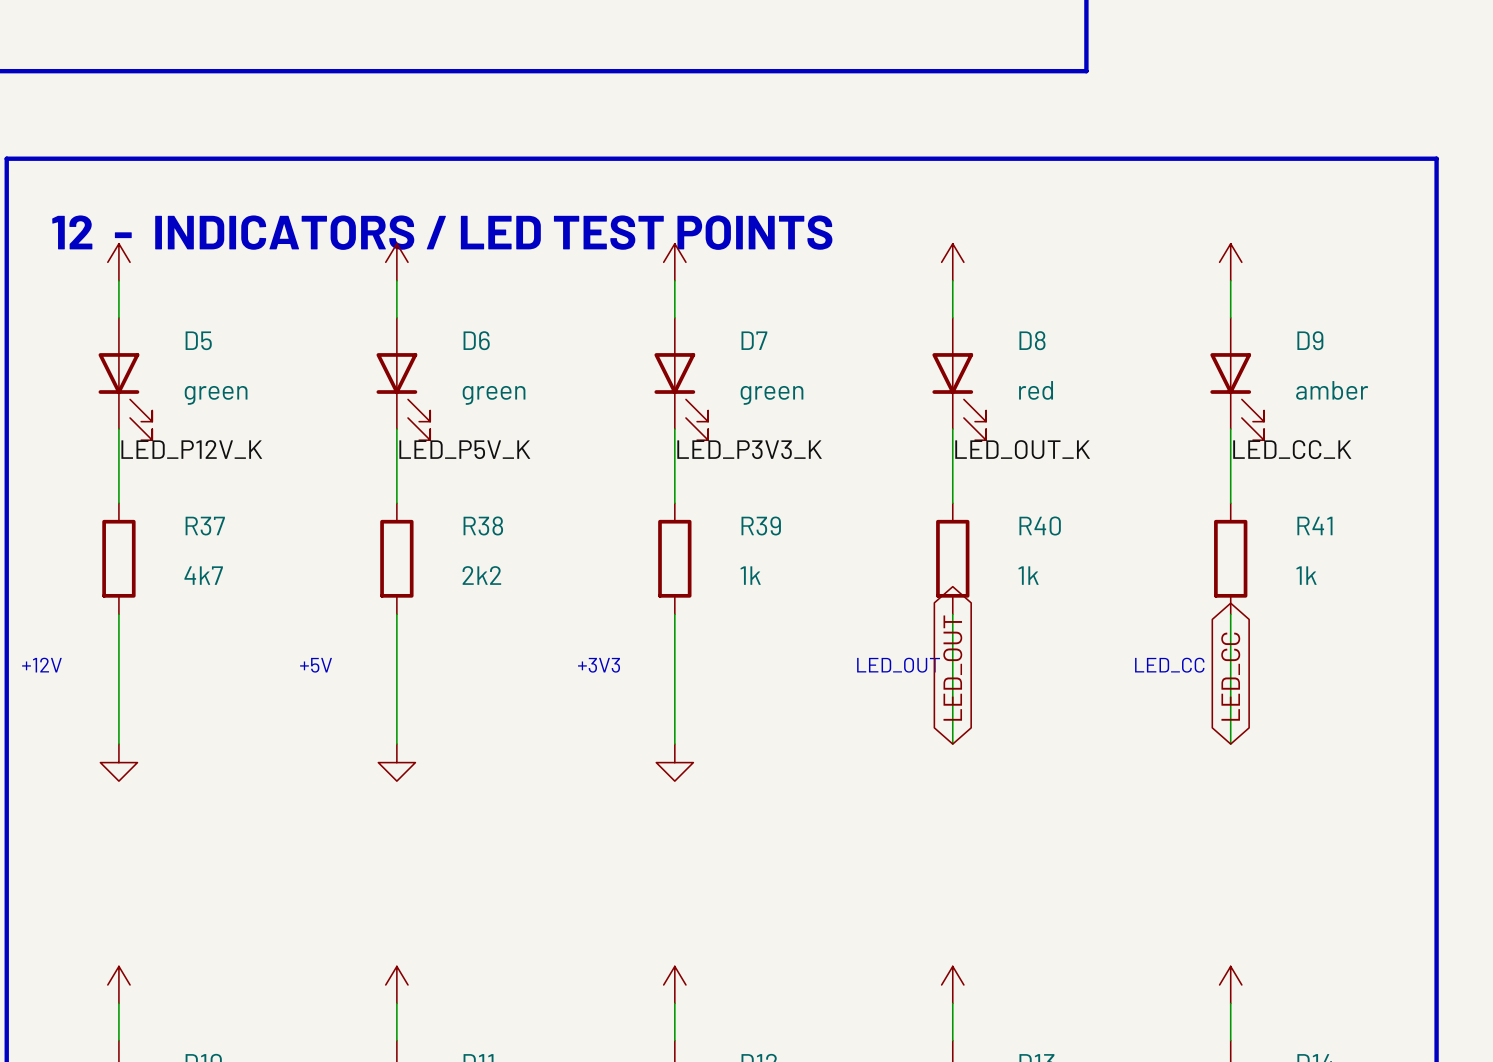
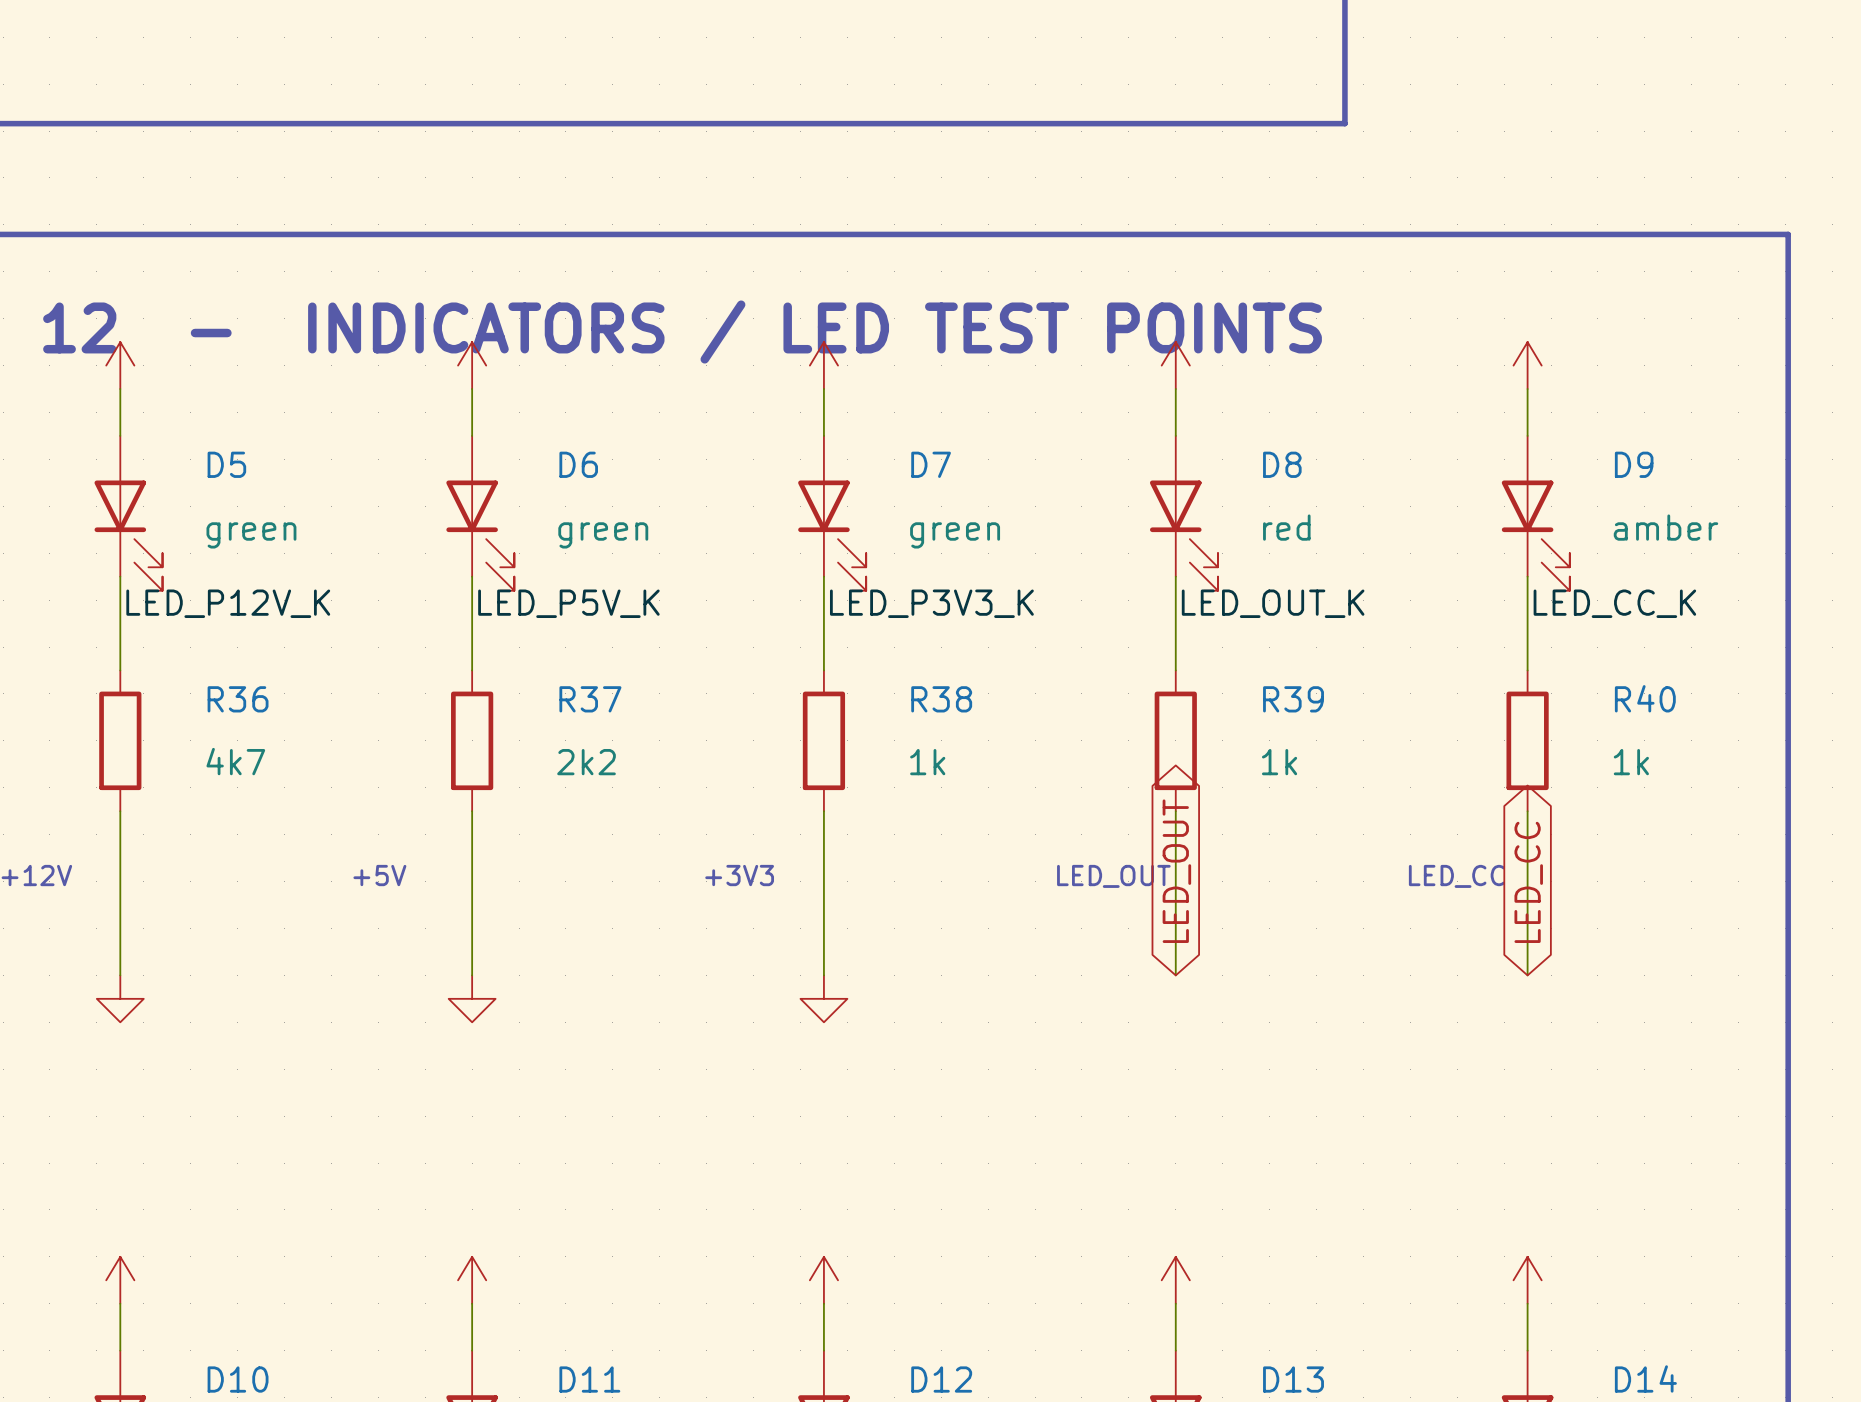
R38 name: R38 (483, 525) -> R37 (590, 699)
R41 name: R41 (1314, 525) -> R40 (1645, 698)
R37 name: R37 (205, 526) -> R36 (238, 699)
R39 name: R39 (761, 526) -> R38 (941, 699)
R40 name: R40 (1040, 526) -> R39 (1293, 699)

